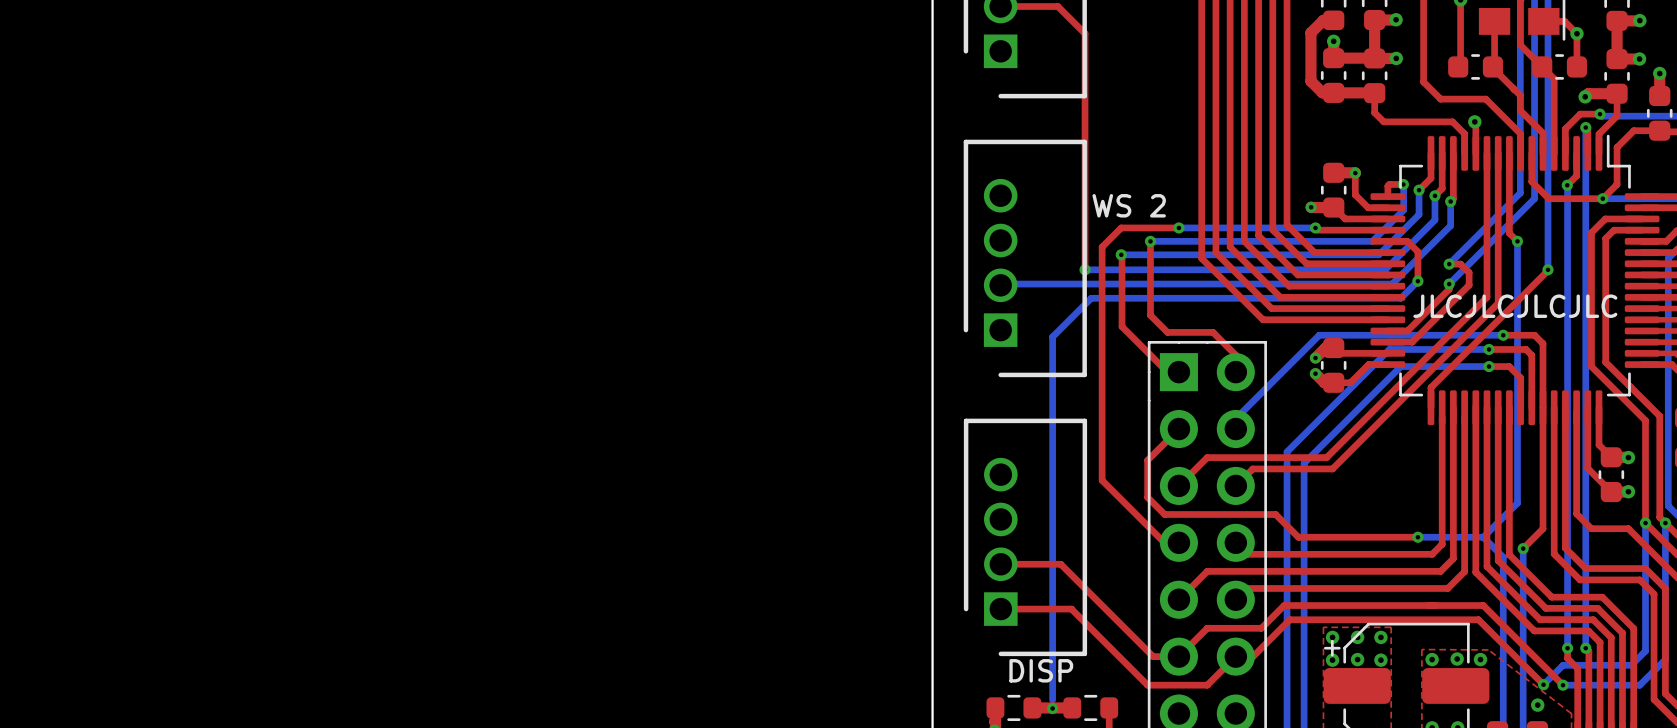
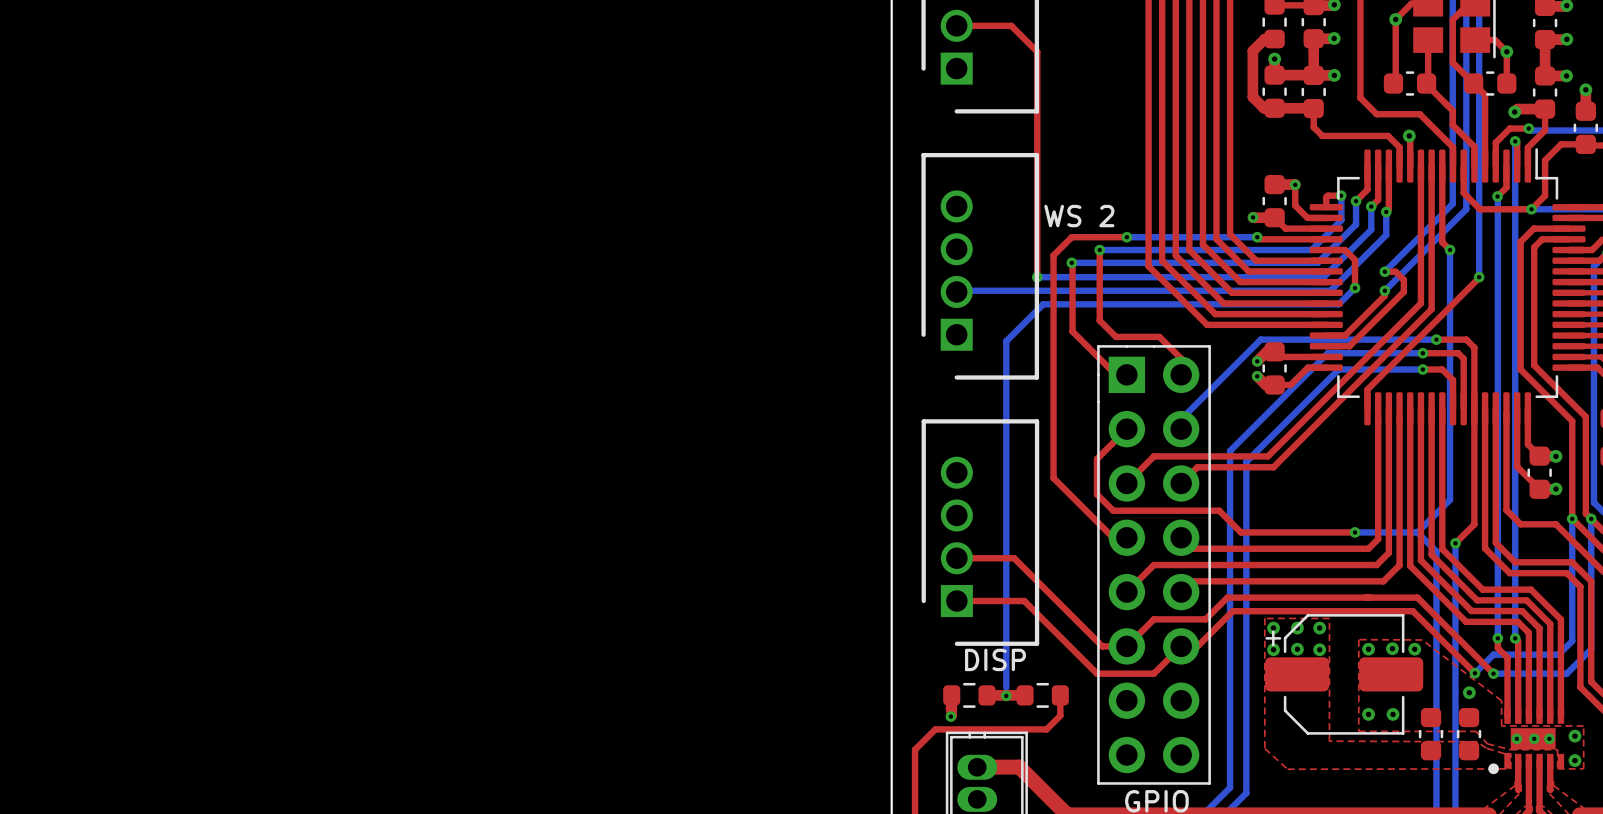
text: JLCJLCJLCJLC (1515, 306) -> none

